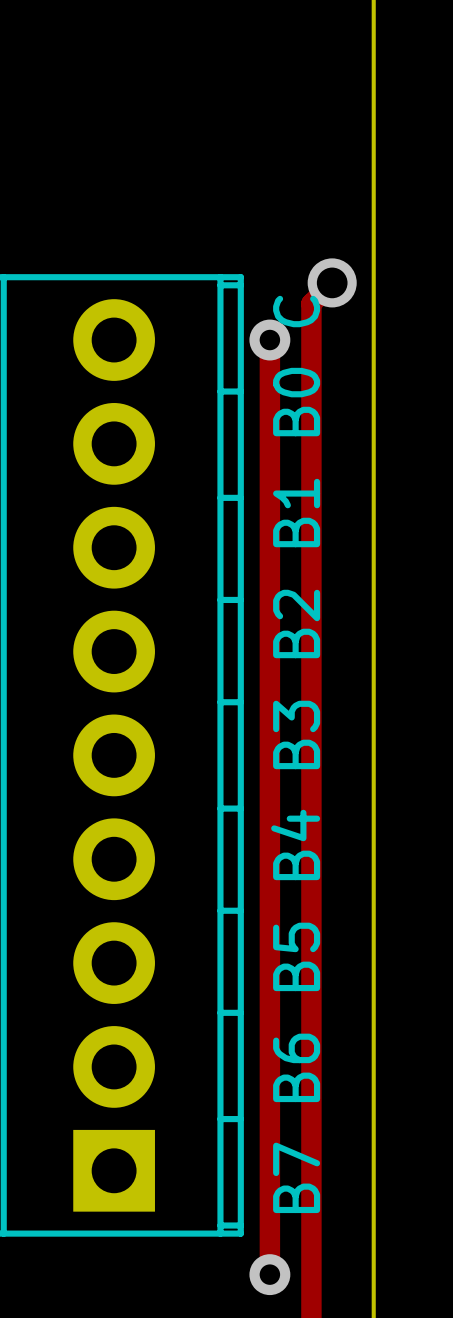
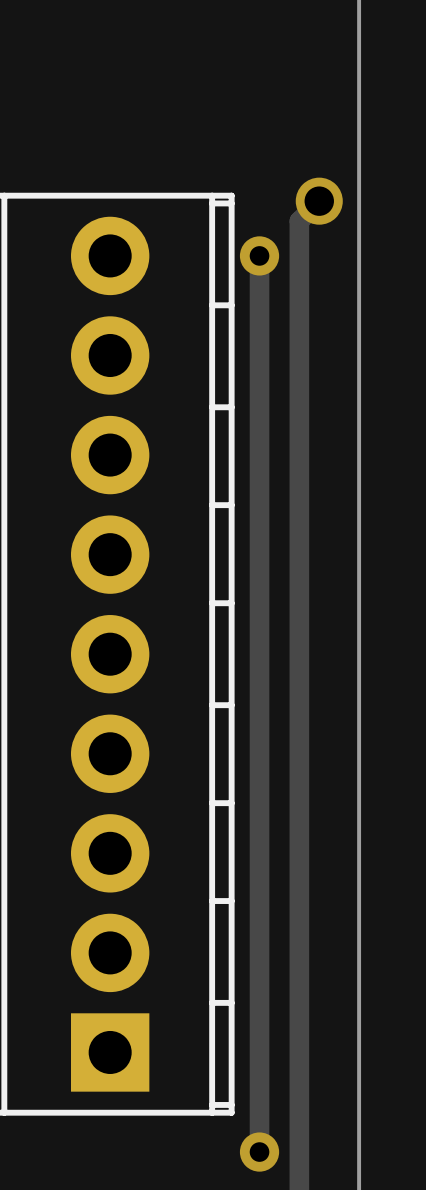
part value: B7 B6 B5 B4 B3 B2 B1 B0 C (295, 754) -> none

